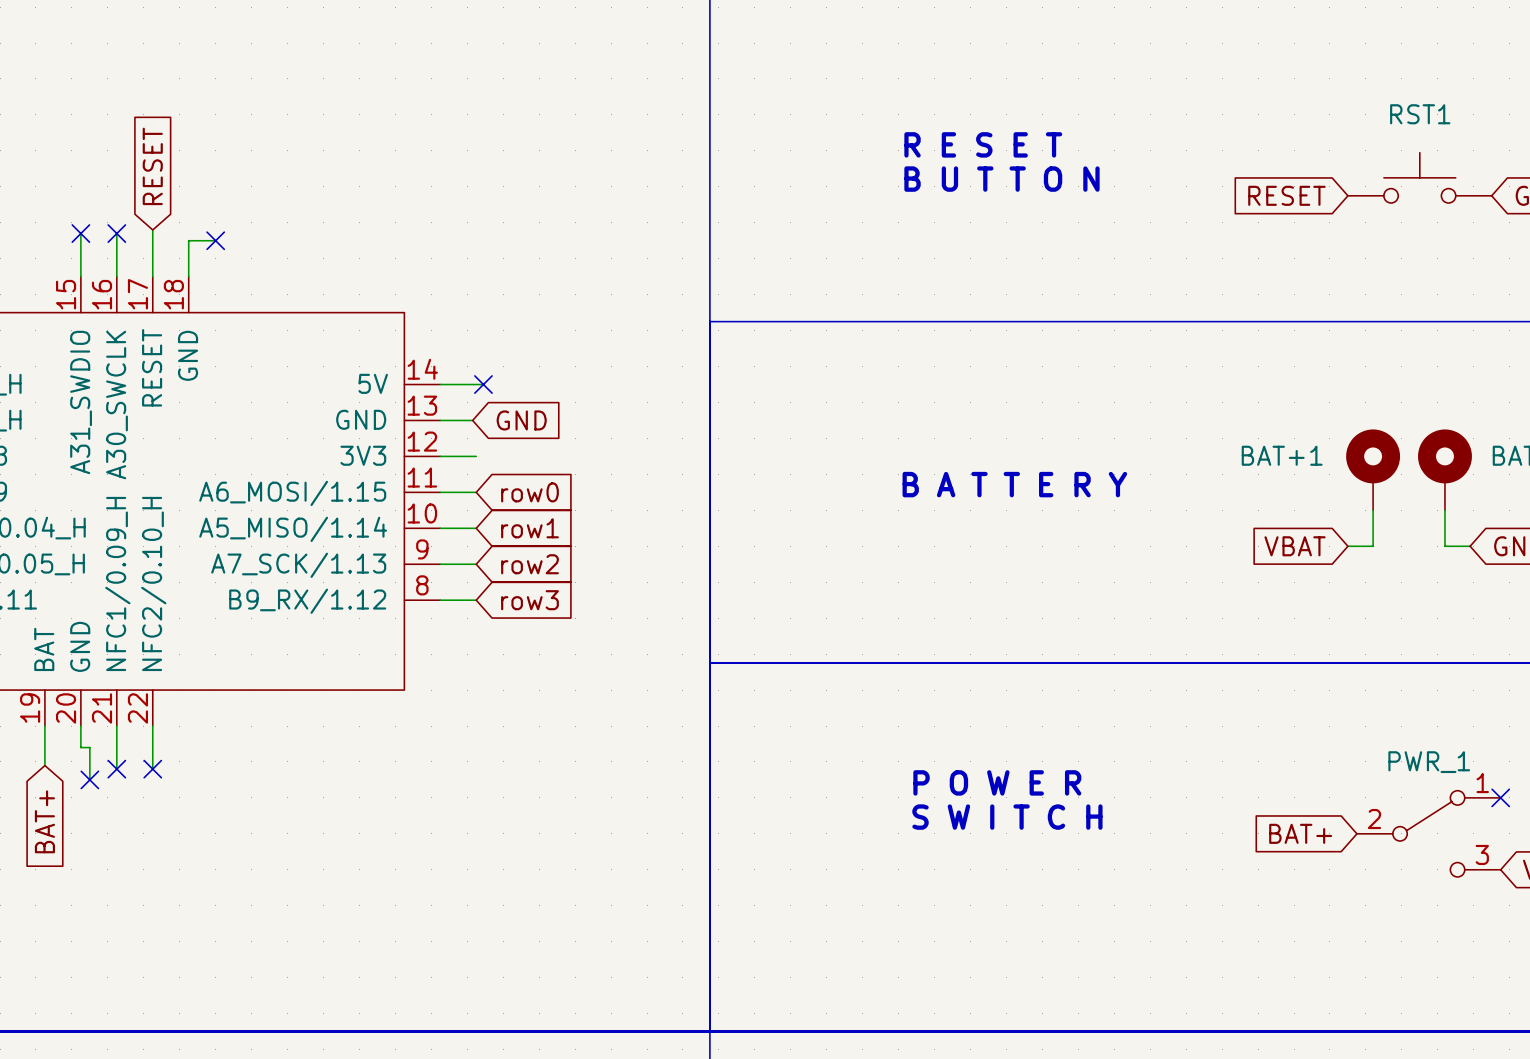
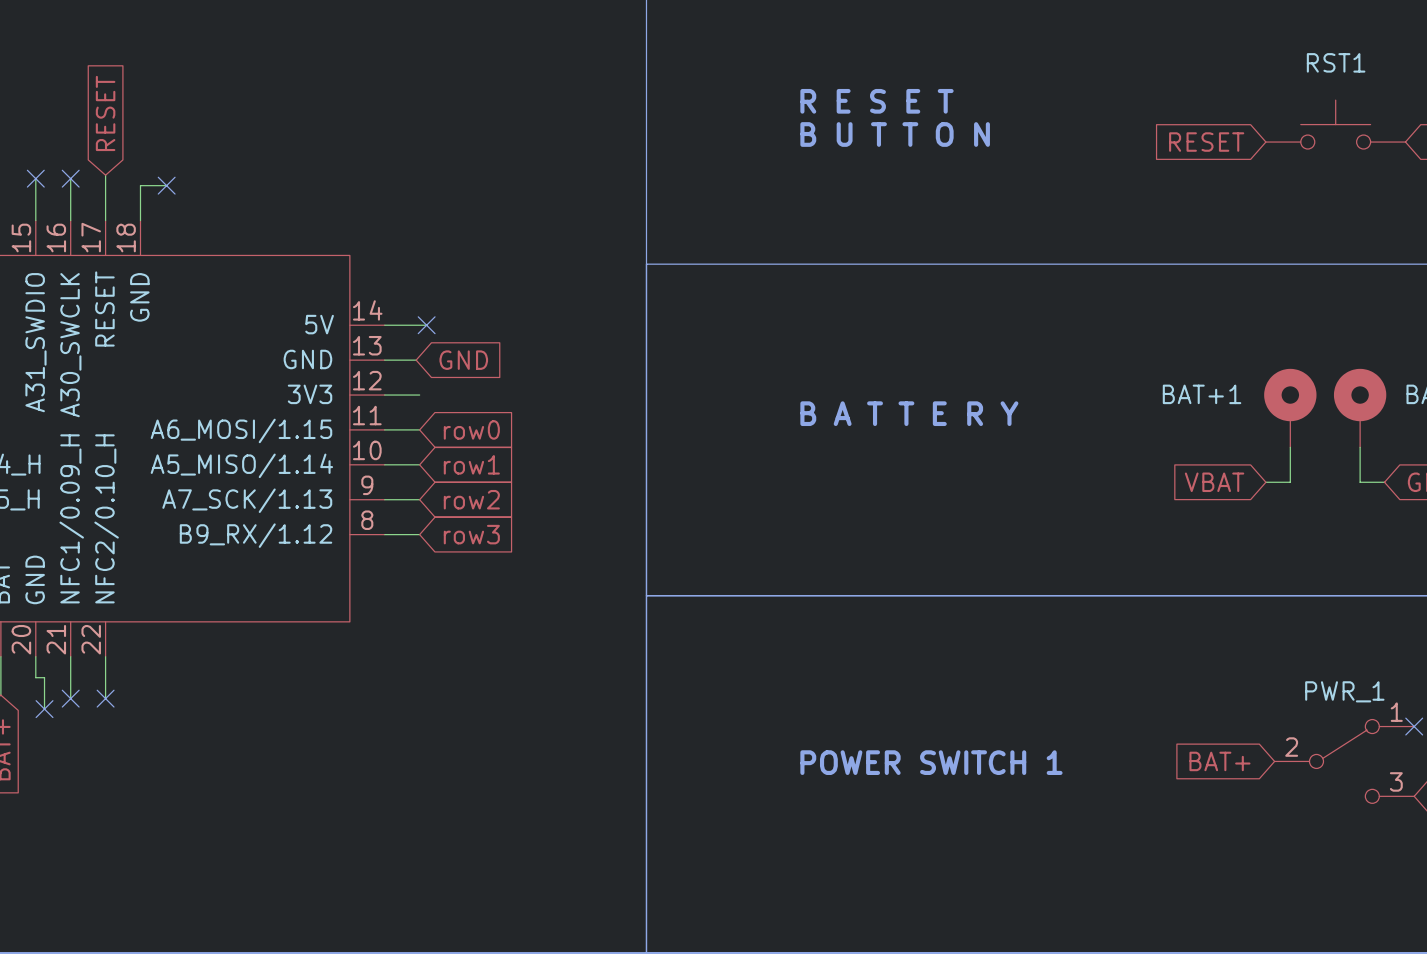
text position: R E S E T (983, 144) -> R E S E T (876, 101)
text position: B U T T O N (1001, 179) -> B U T T O N (895, 134)
text position: B A T T E R Y (1014, 484) -> B A T T E R Y (909, 413)
text: P O W E R (997, 782) -> none
text: S W I T C H (1007, 817) -> none
text: none -> POWER SWITCH 1 (931, 762)

